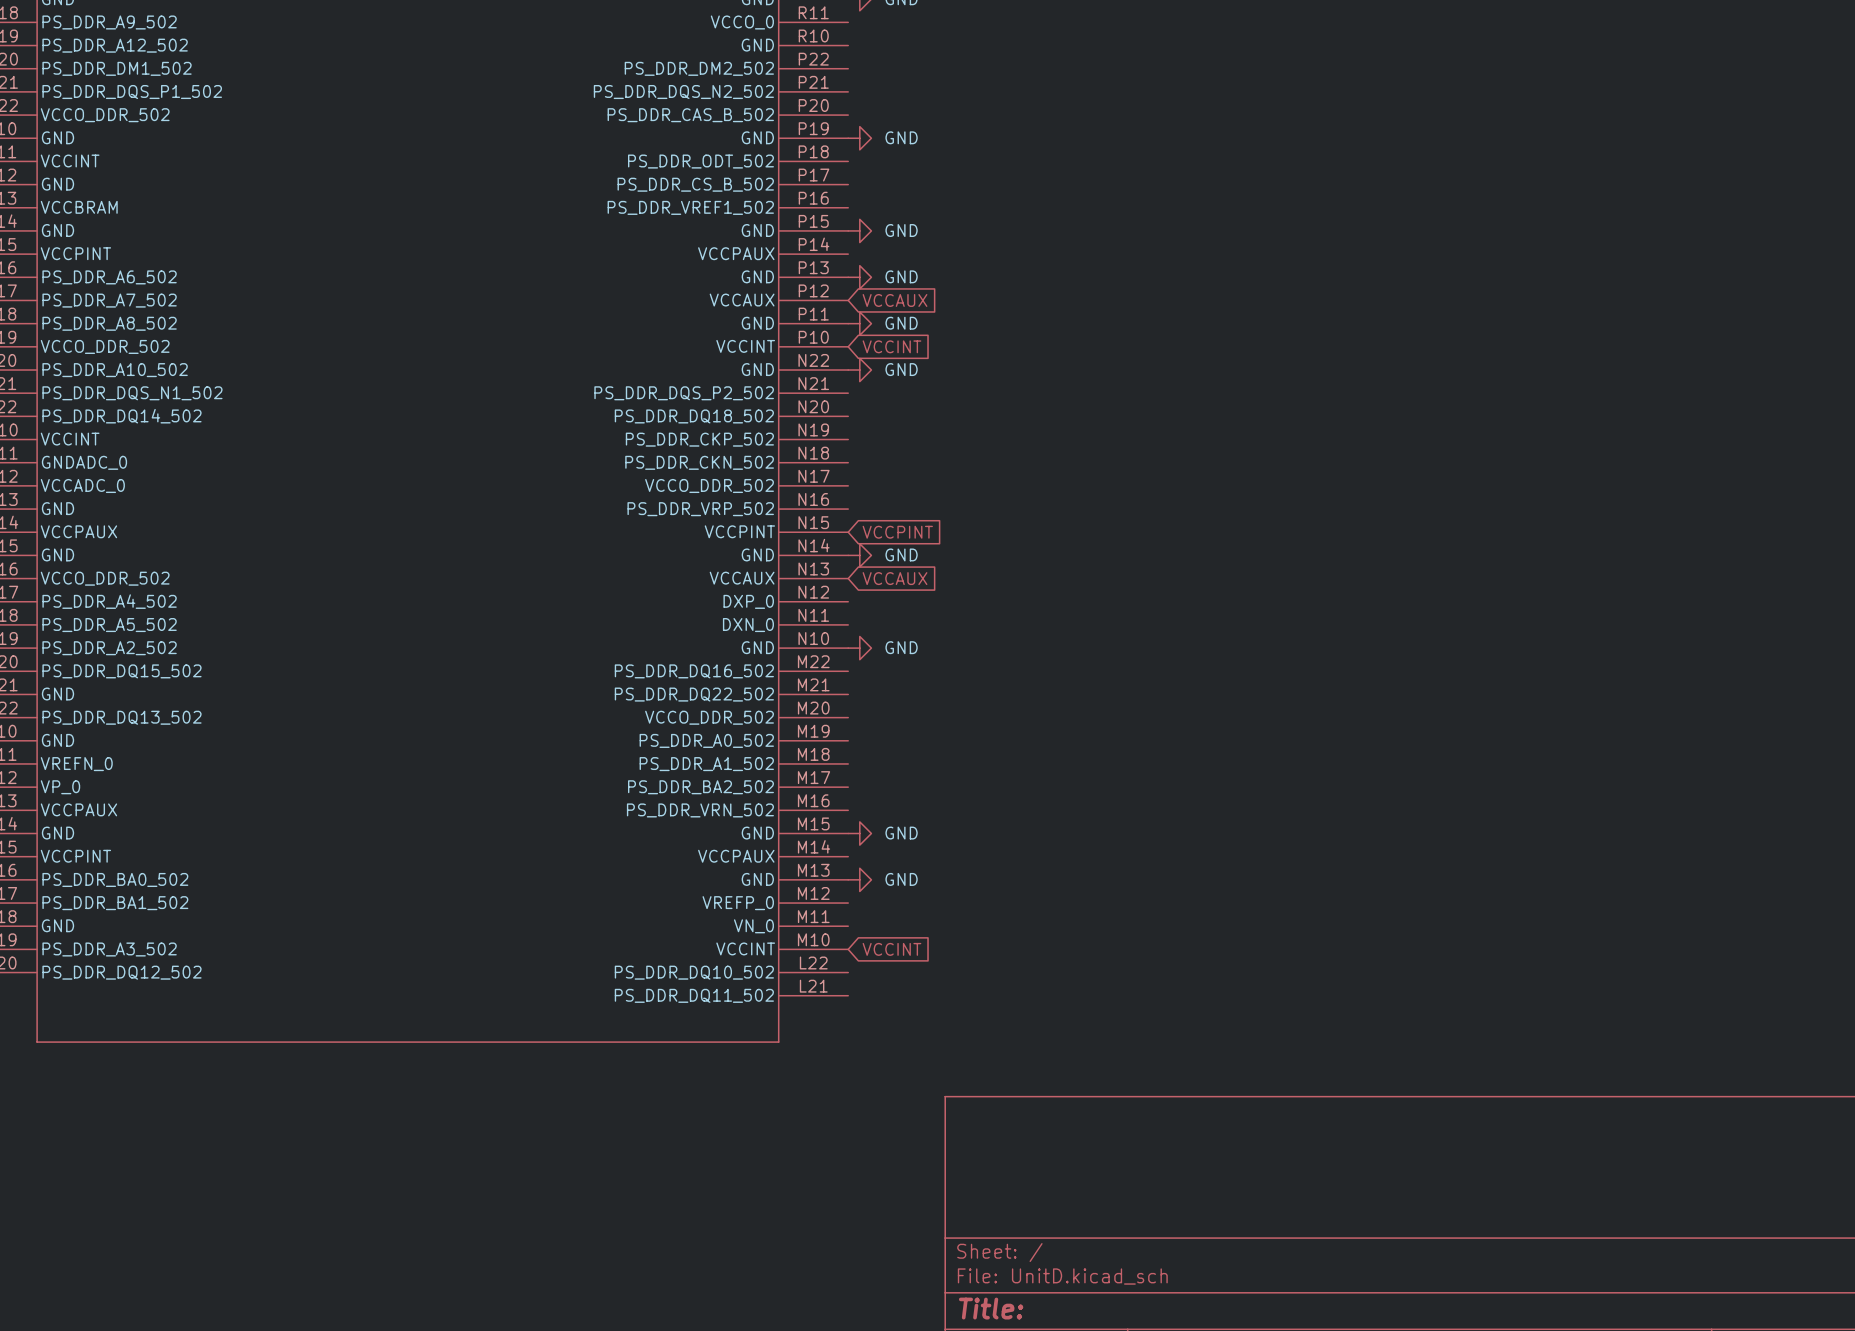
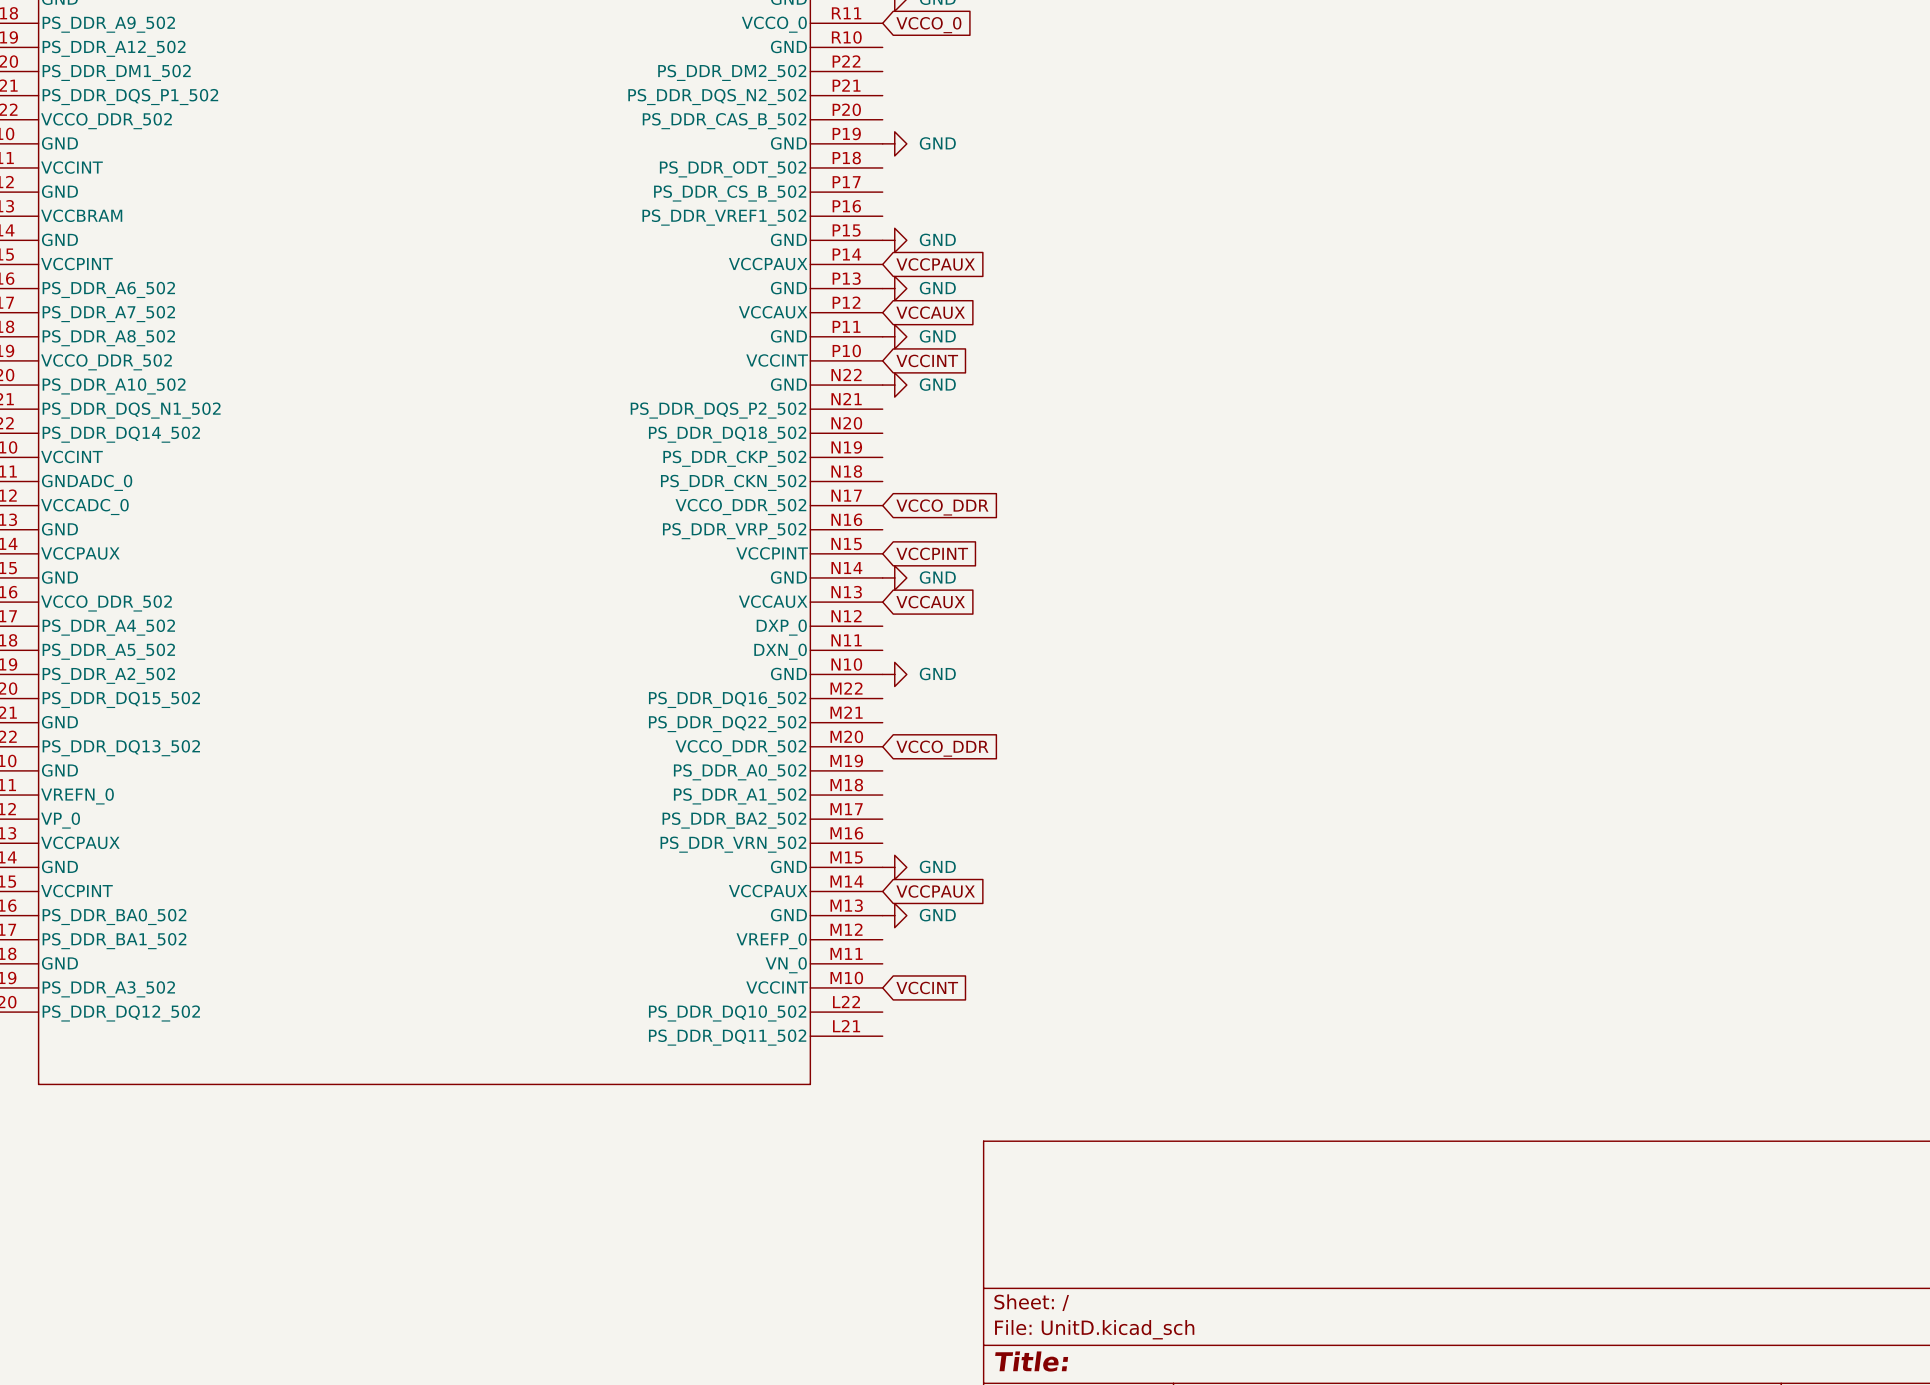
global label: none -> VCCO_0 (928, 25)
global label: none -> VCCPAUX (935, 264)
global label: none -> VCCO_DDR (942, 507)
global label: none -> VCCO_DDR (942, 748)
global label: none -> VCCPAUX (935, 891)

